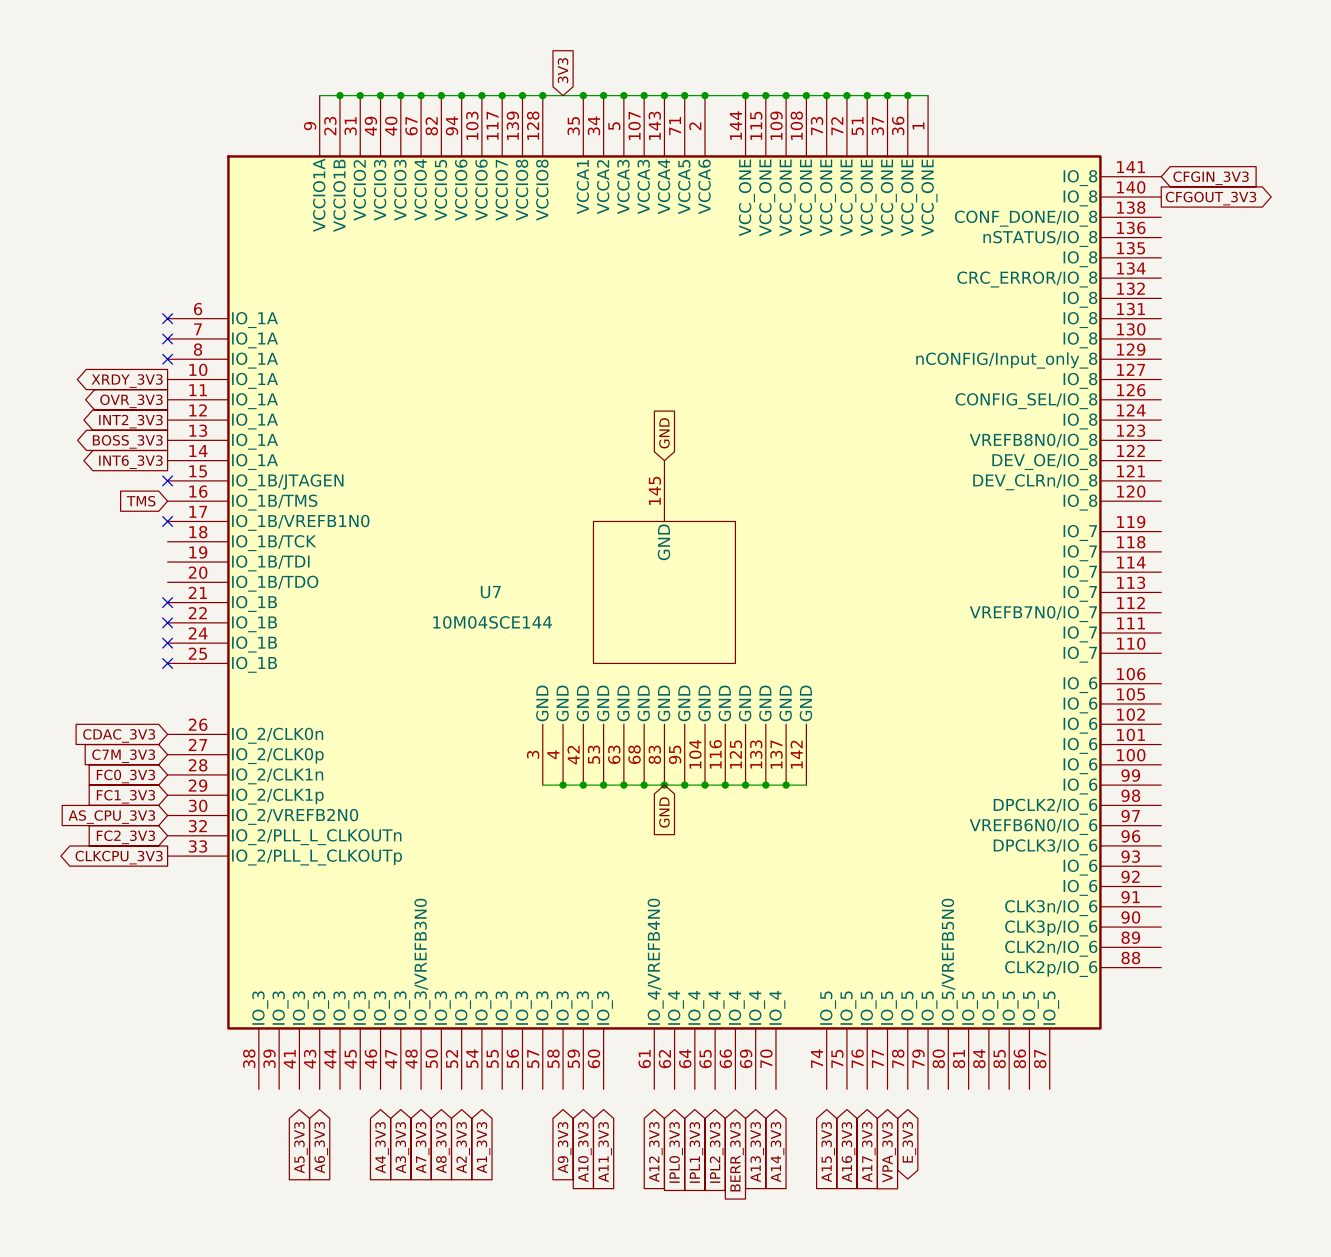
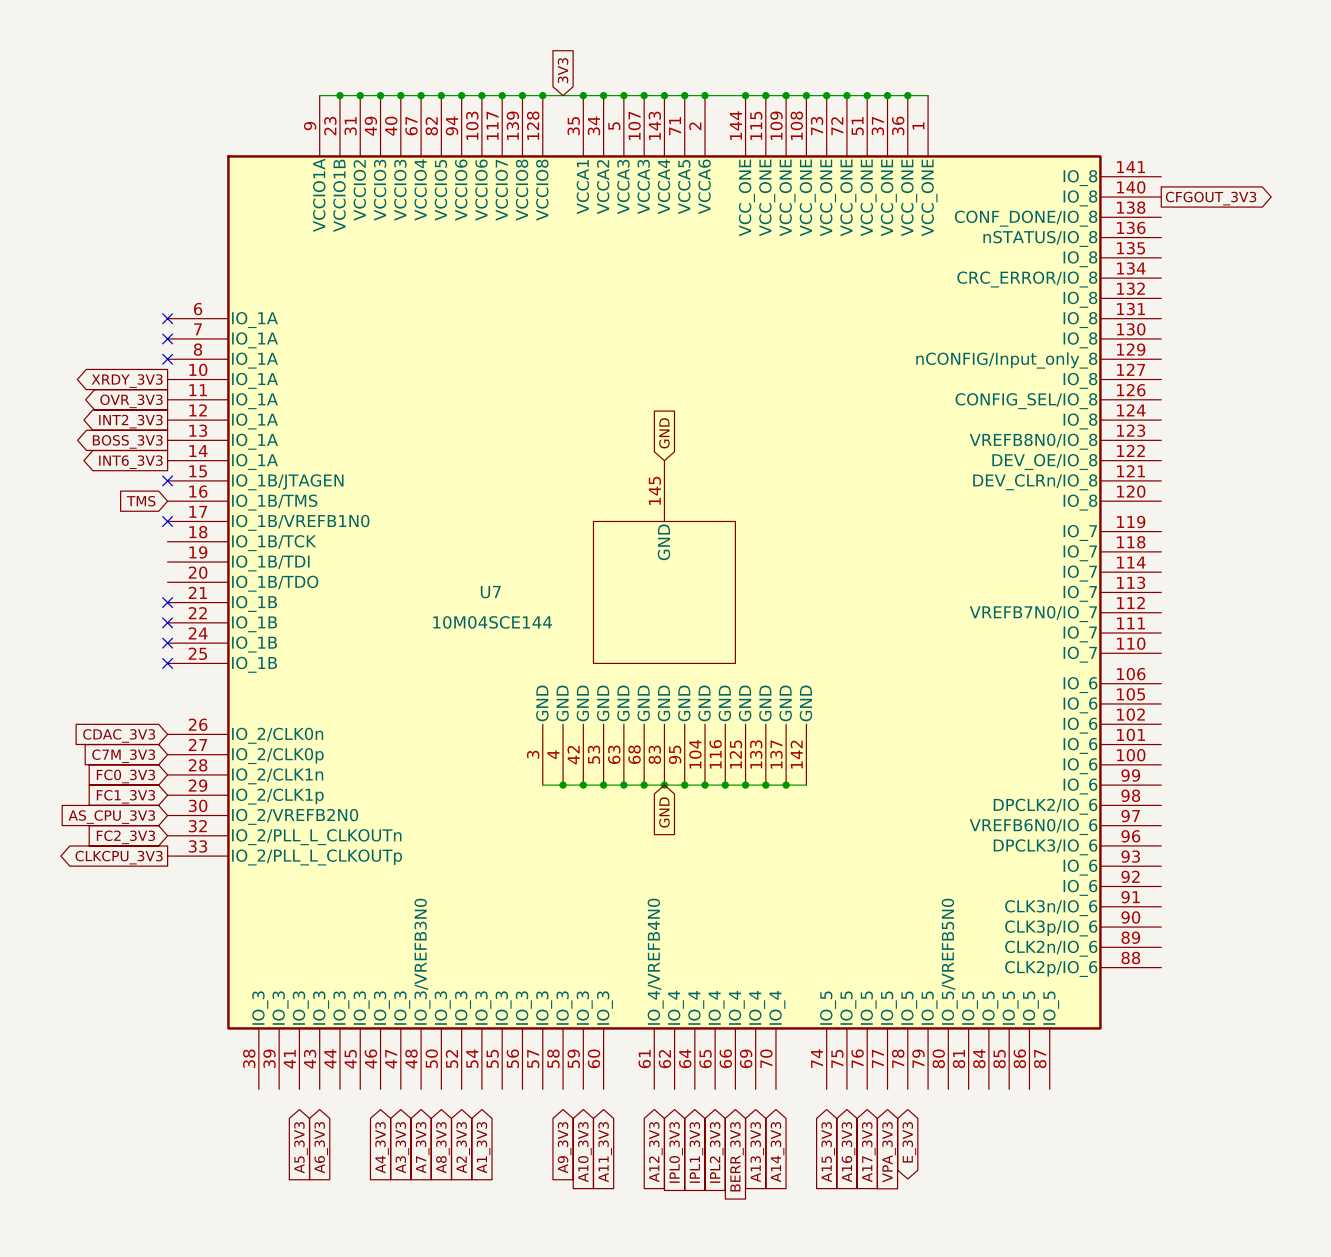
global label: CFGIN_3V3 (1211, 178) -> none

